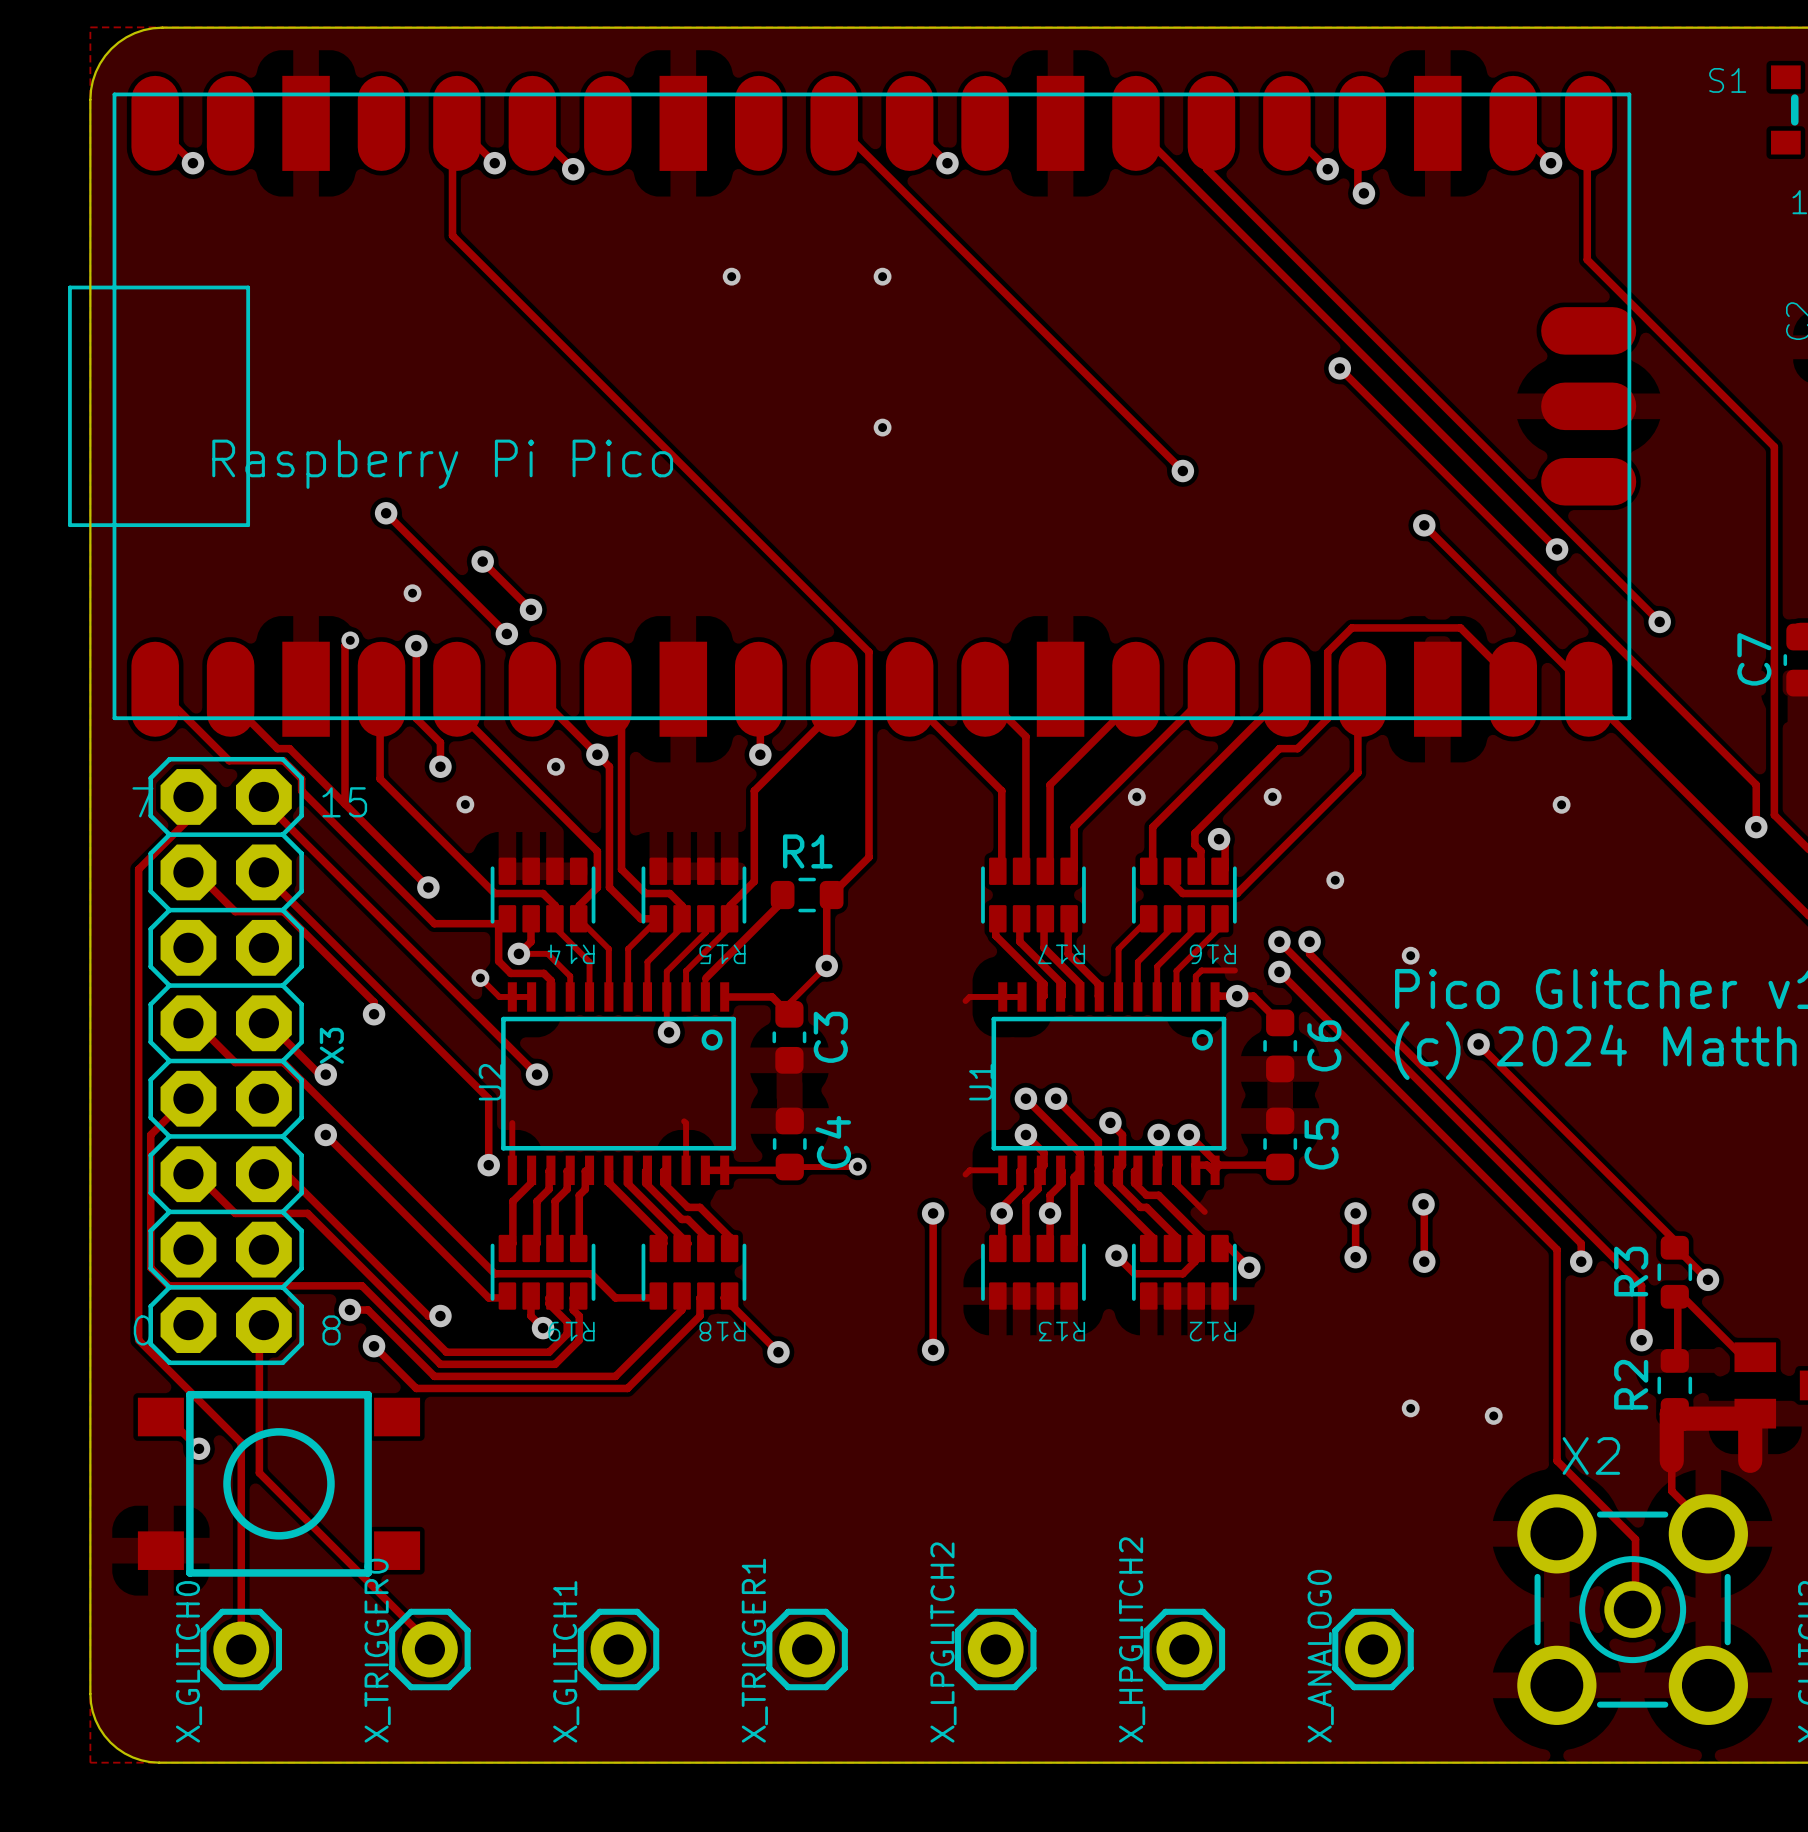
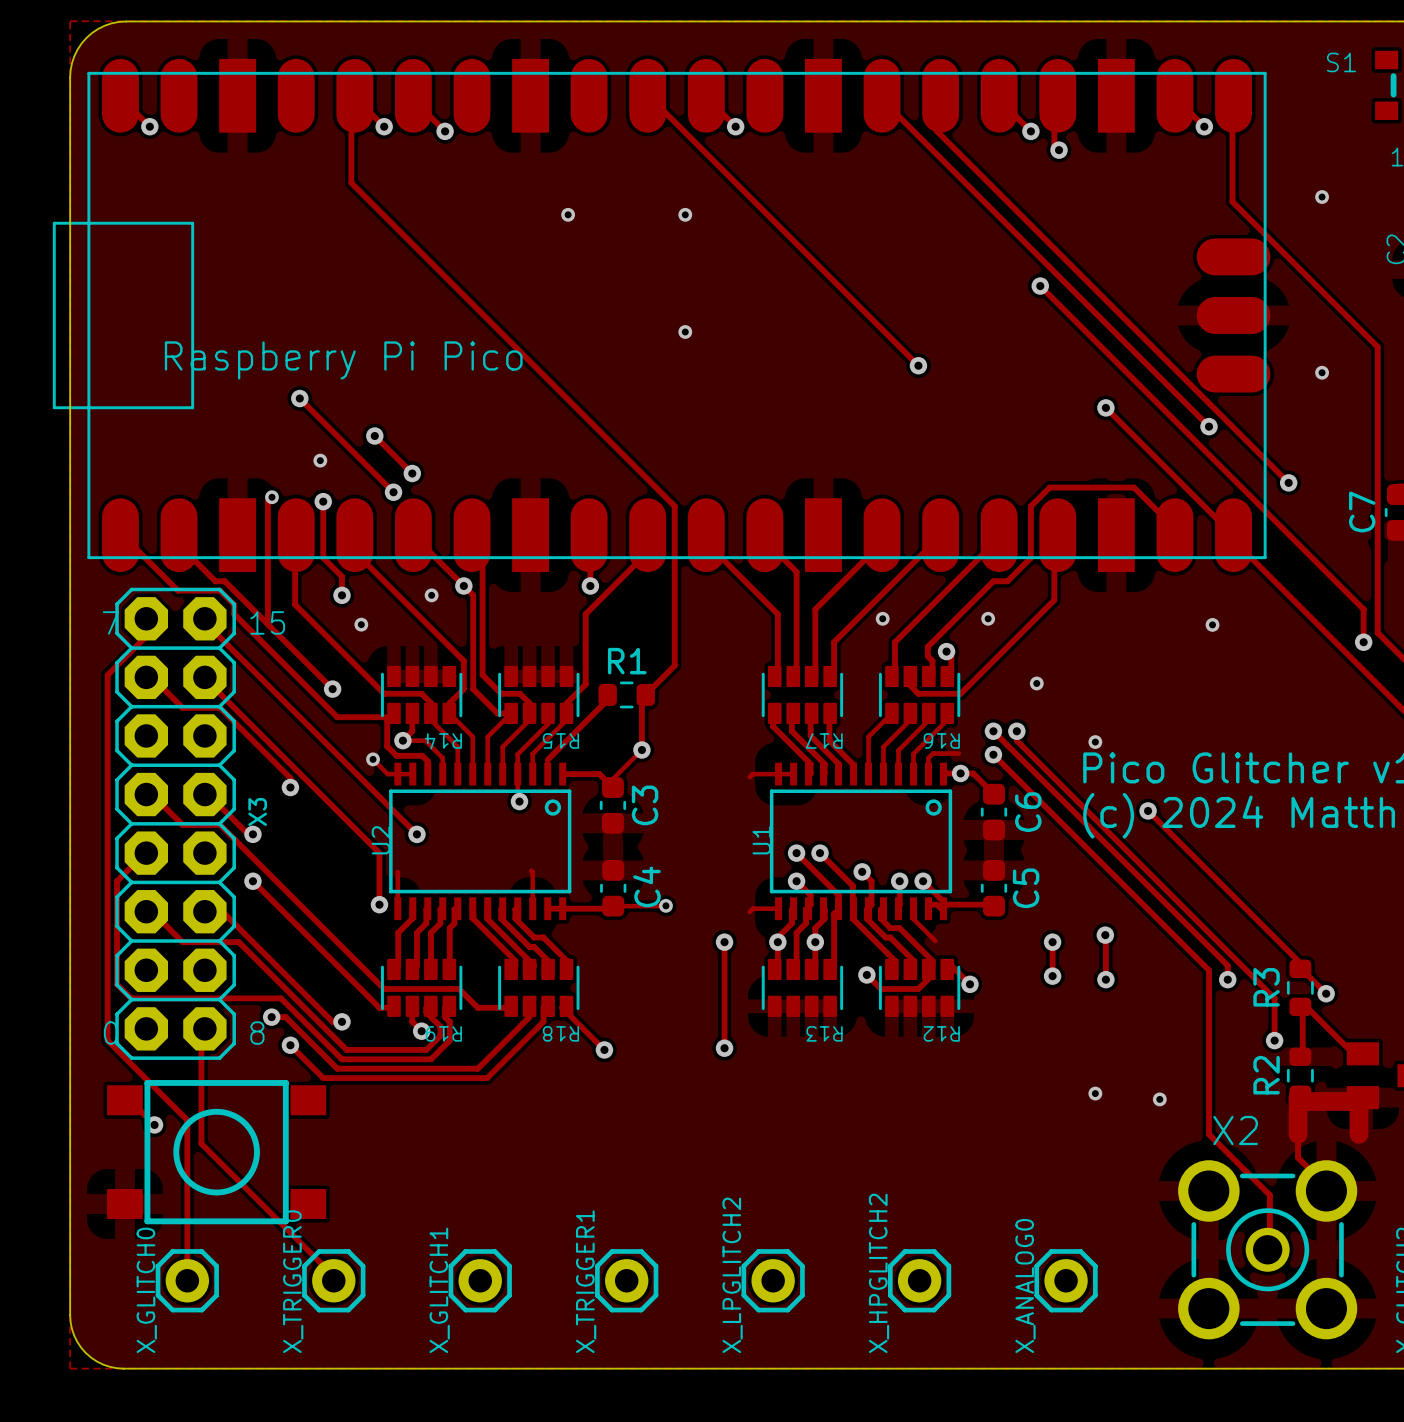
via: none -> (1322, 197)
via: none -> (1322, 372)

